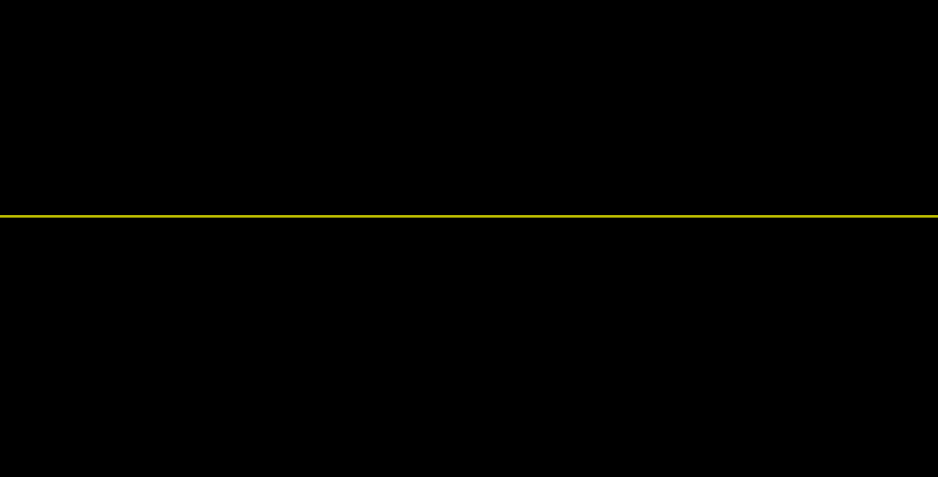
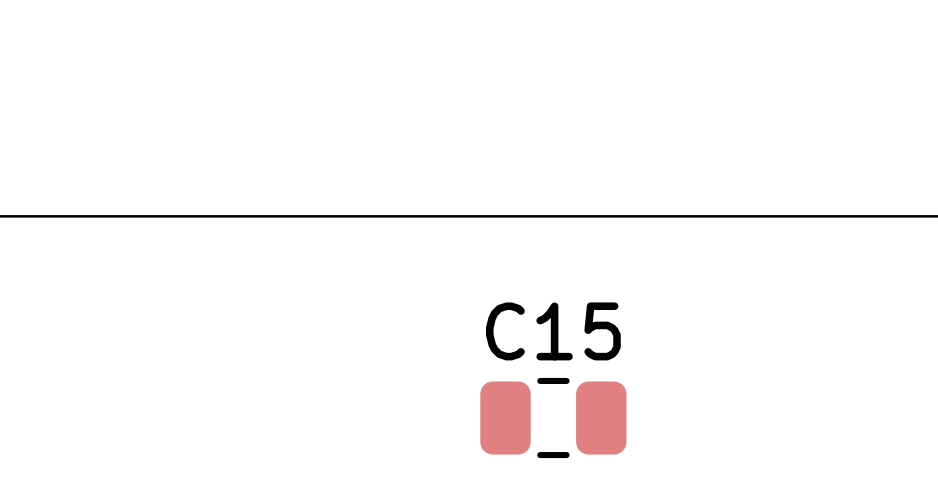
C15: none -> (553, 418)

